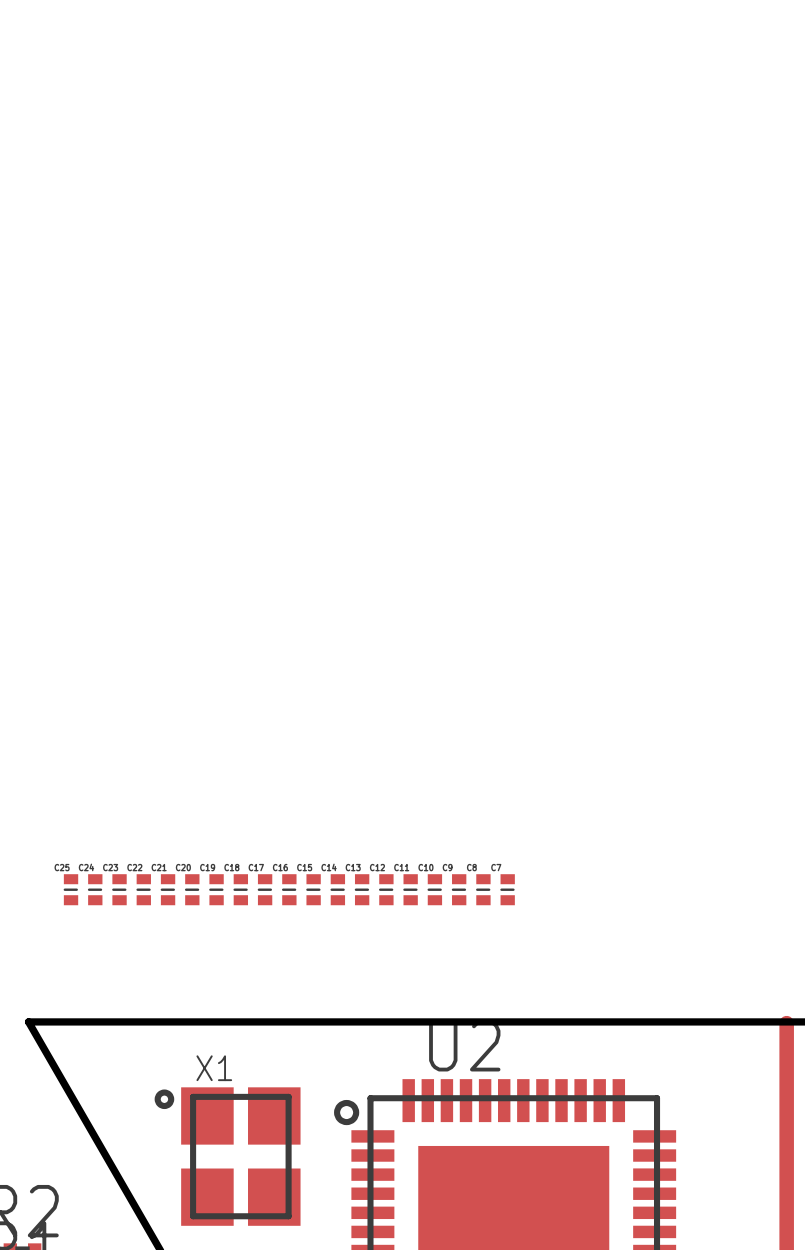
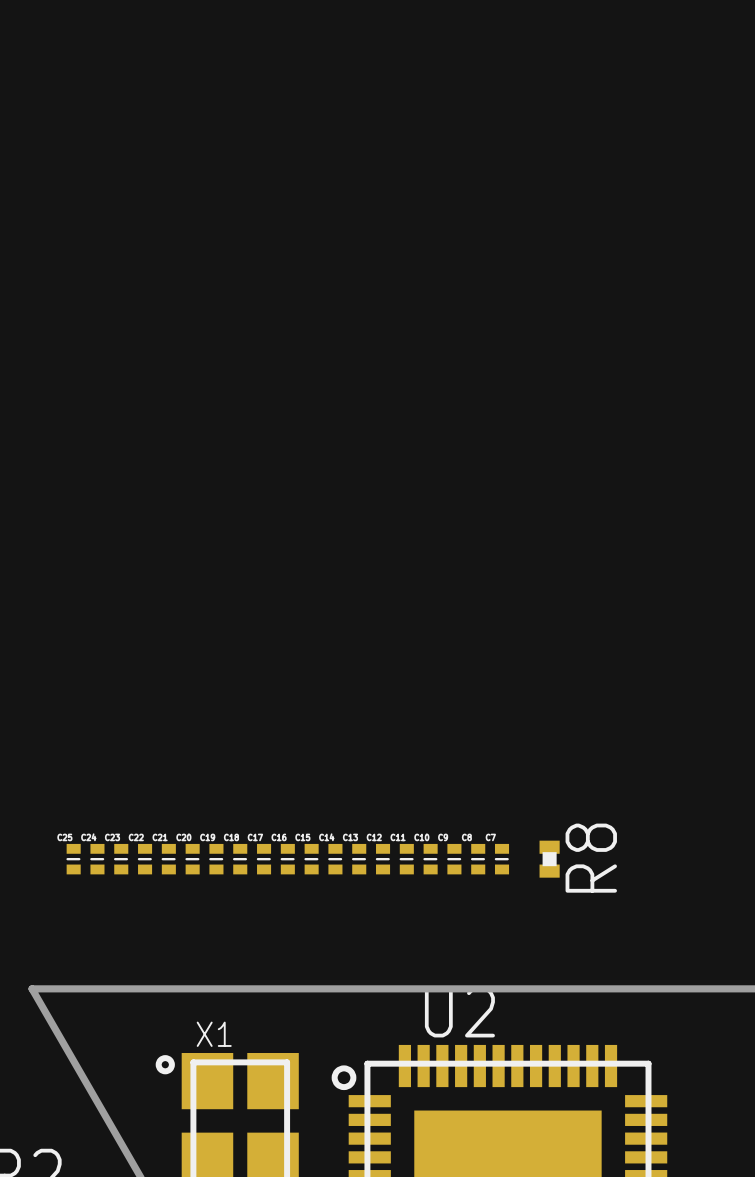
R8: none -> (549, 859)

